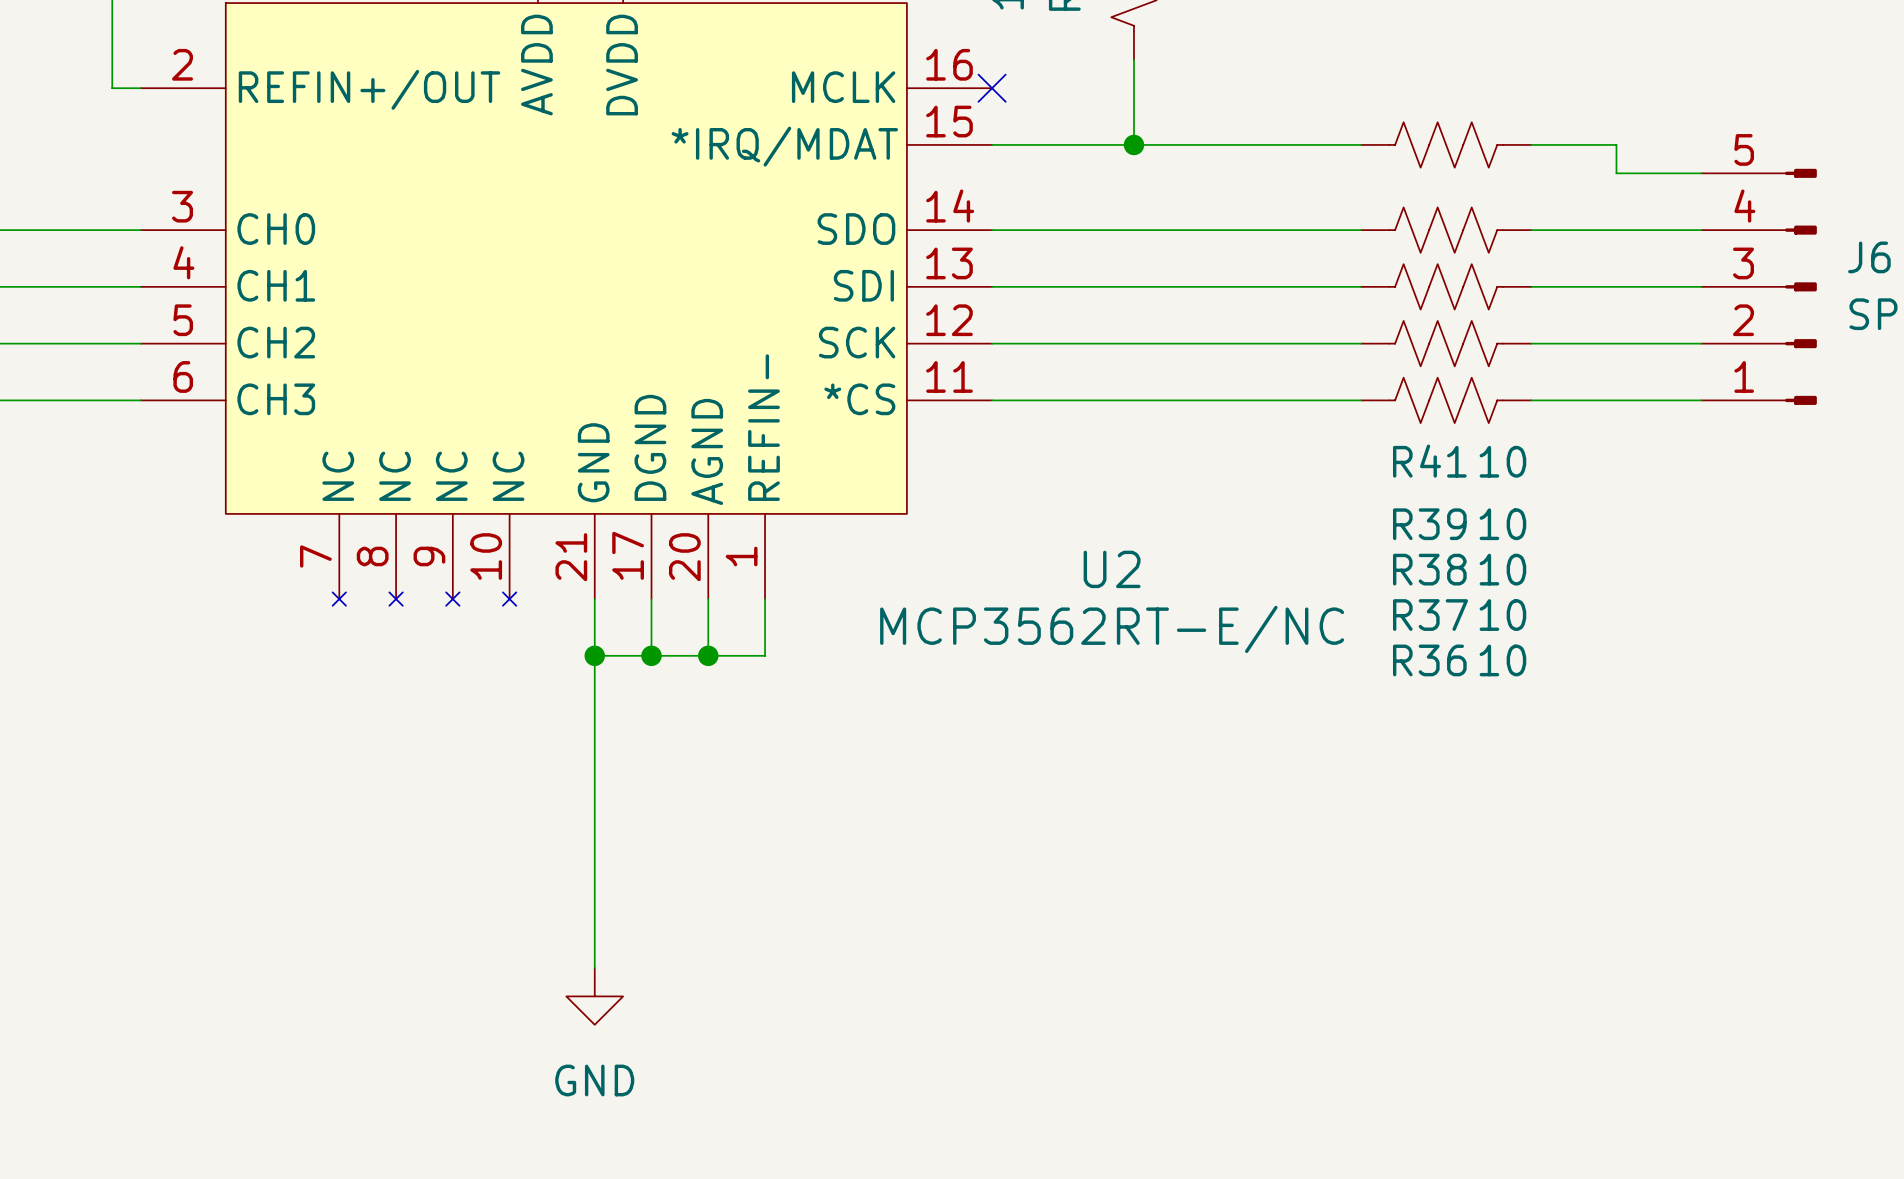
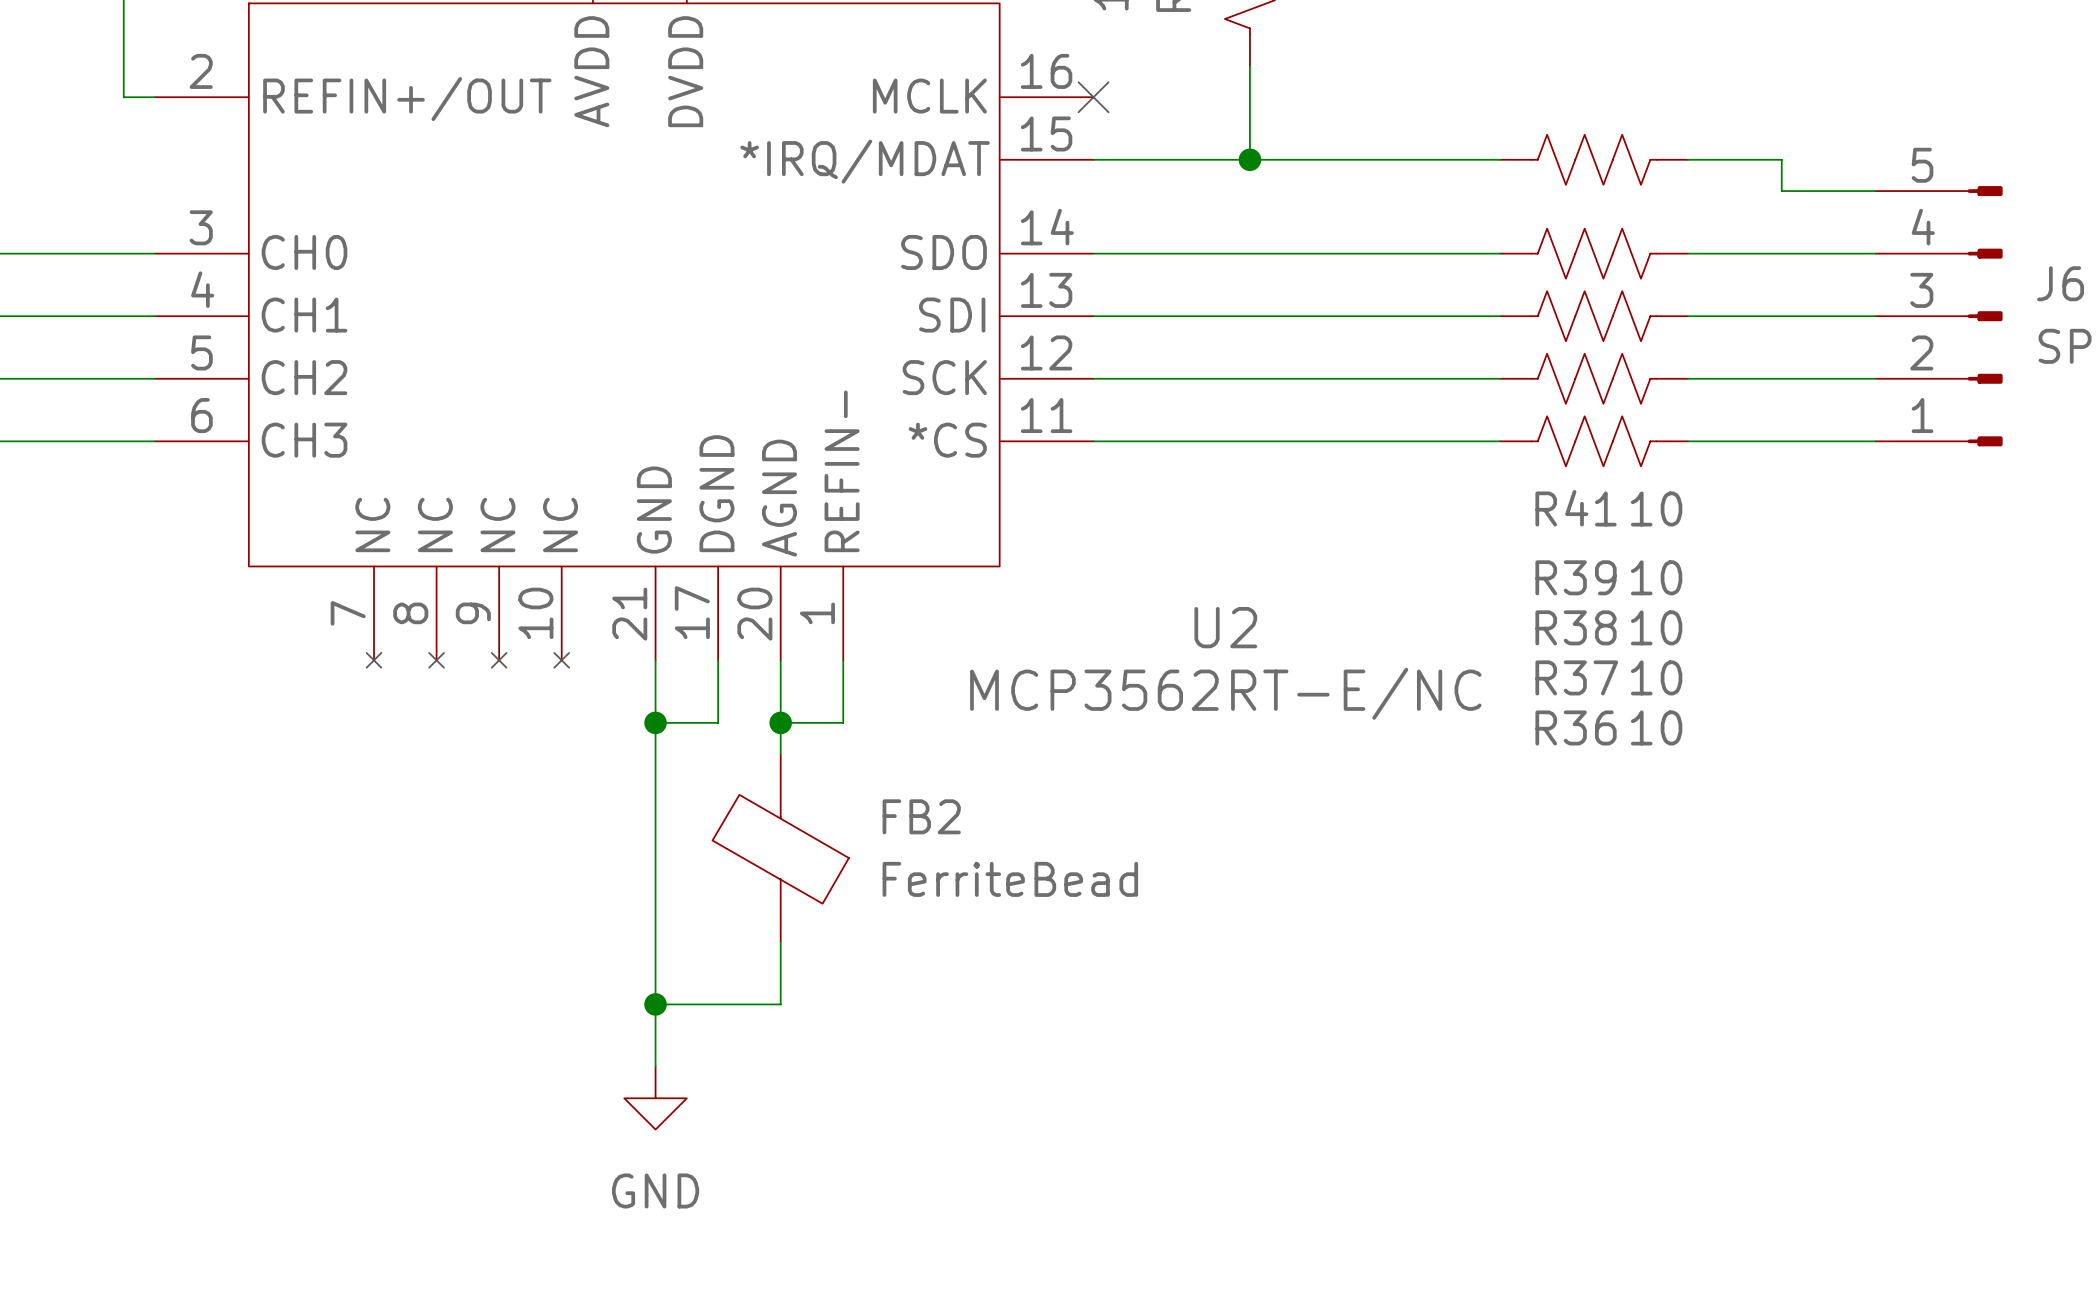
wire: (651, 655) (708, 655) -> (780, 754) (780, 722)
junction: (651, 655) -> none
FB2: none -> FerriteBead (780, 848)
wire: none -> (780, 941) (780, 1004) (655, 1004)
junction: none -> (655, 1004)

